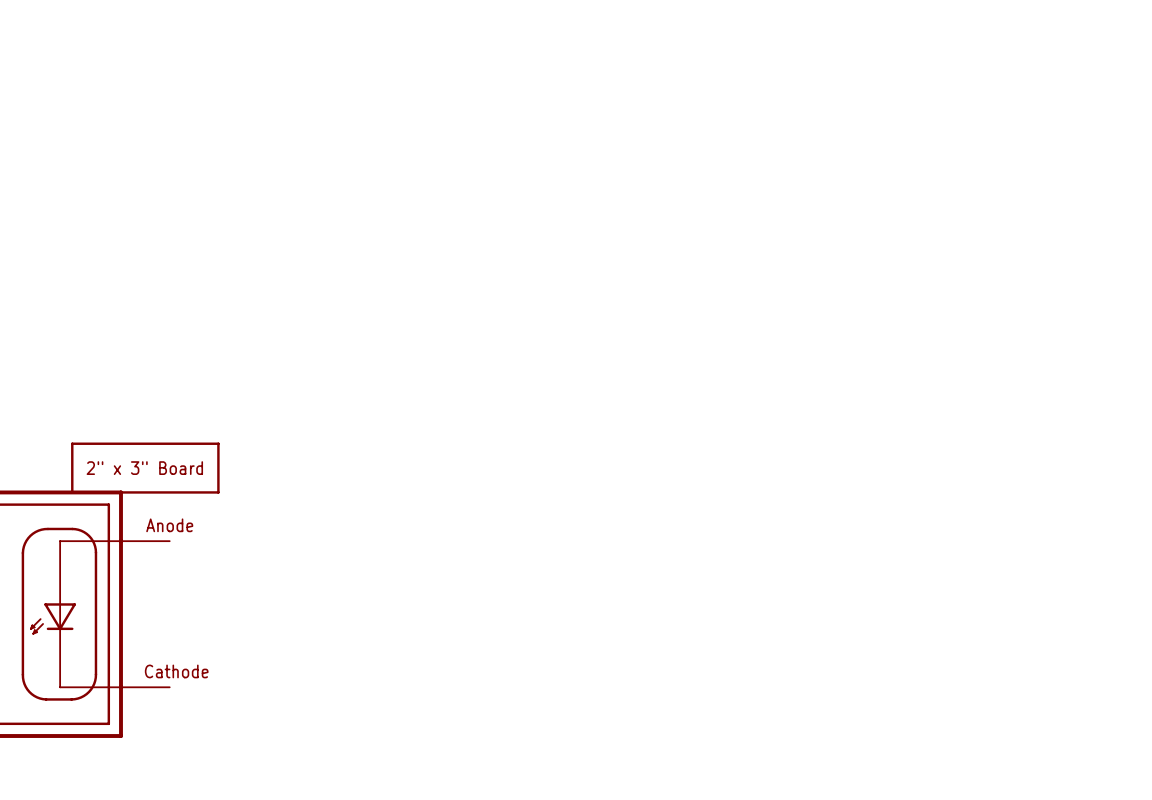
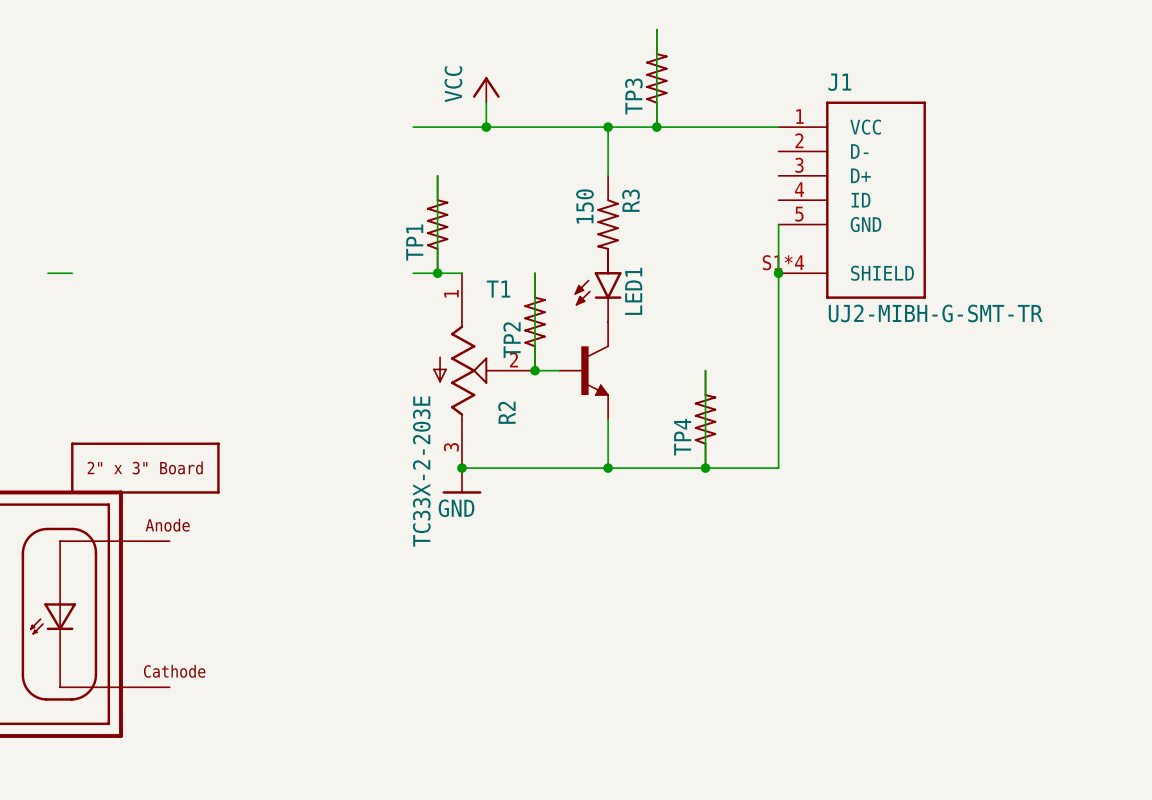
wire: none -> (656, 29) (656, 127)
TP3: none -> (656, 78)
power symbol: none -> VCC (486, 89)
wire: none -> (486, 102) (486, 127)
wire: none -> (413, 127) (778, 127)
junction: none -> (486, 127)
wire: none -> (608, 127) (608, 175)
junction: none -> (608, 127)
junction: none -> (656, 127)
wire: none -> (437, 175) (437, 273)
J1: none -> UJ2-MIBH-G-SMT-TR (852, 200)
TP1: none -> (437, 224)
R3: none -> 150 (608, 224)
wire: none -> (778, 224) (778, 468) (461, 468)
wire: none -> (47, 273) (72, 273)
wire: none -> (413, 273) (461, 273)
junction: none -> (437, 273)
wire: none -> (535, 273) (535, 370) (559, 370)
junction: none -> (778, 273)
LED1: none -> (597, 285)
TP2: none -> (535, 321)
R2: none -> TC33X-2-203E (484, 370)
junction: none -> (535, 370)
T1: none -> (584, 370)
wire: none -> (705, 370) (705, 468)
wire: none -> (608, 419) (608, 468)
TP4: none -> (705, 419)
junction: none -> (461, 468)
junction: none -> (608, 468)
junction: none -> (705, 468)
power symbol: none -> GND (461, 480)

